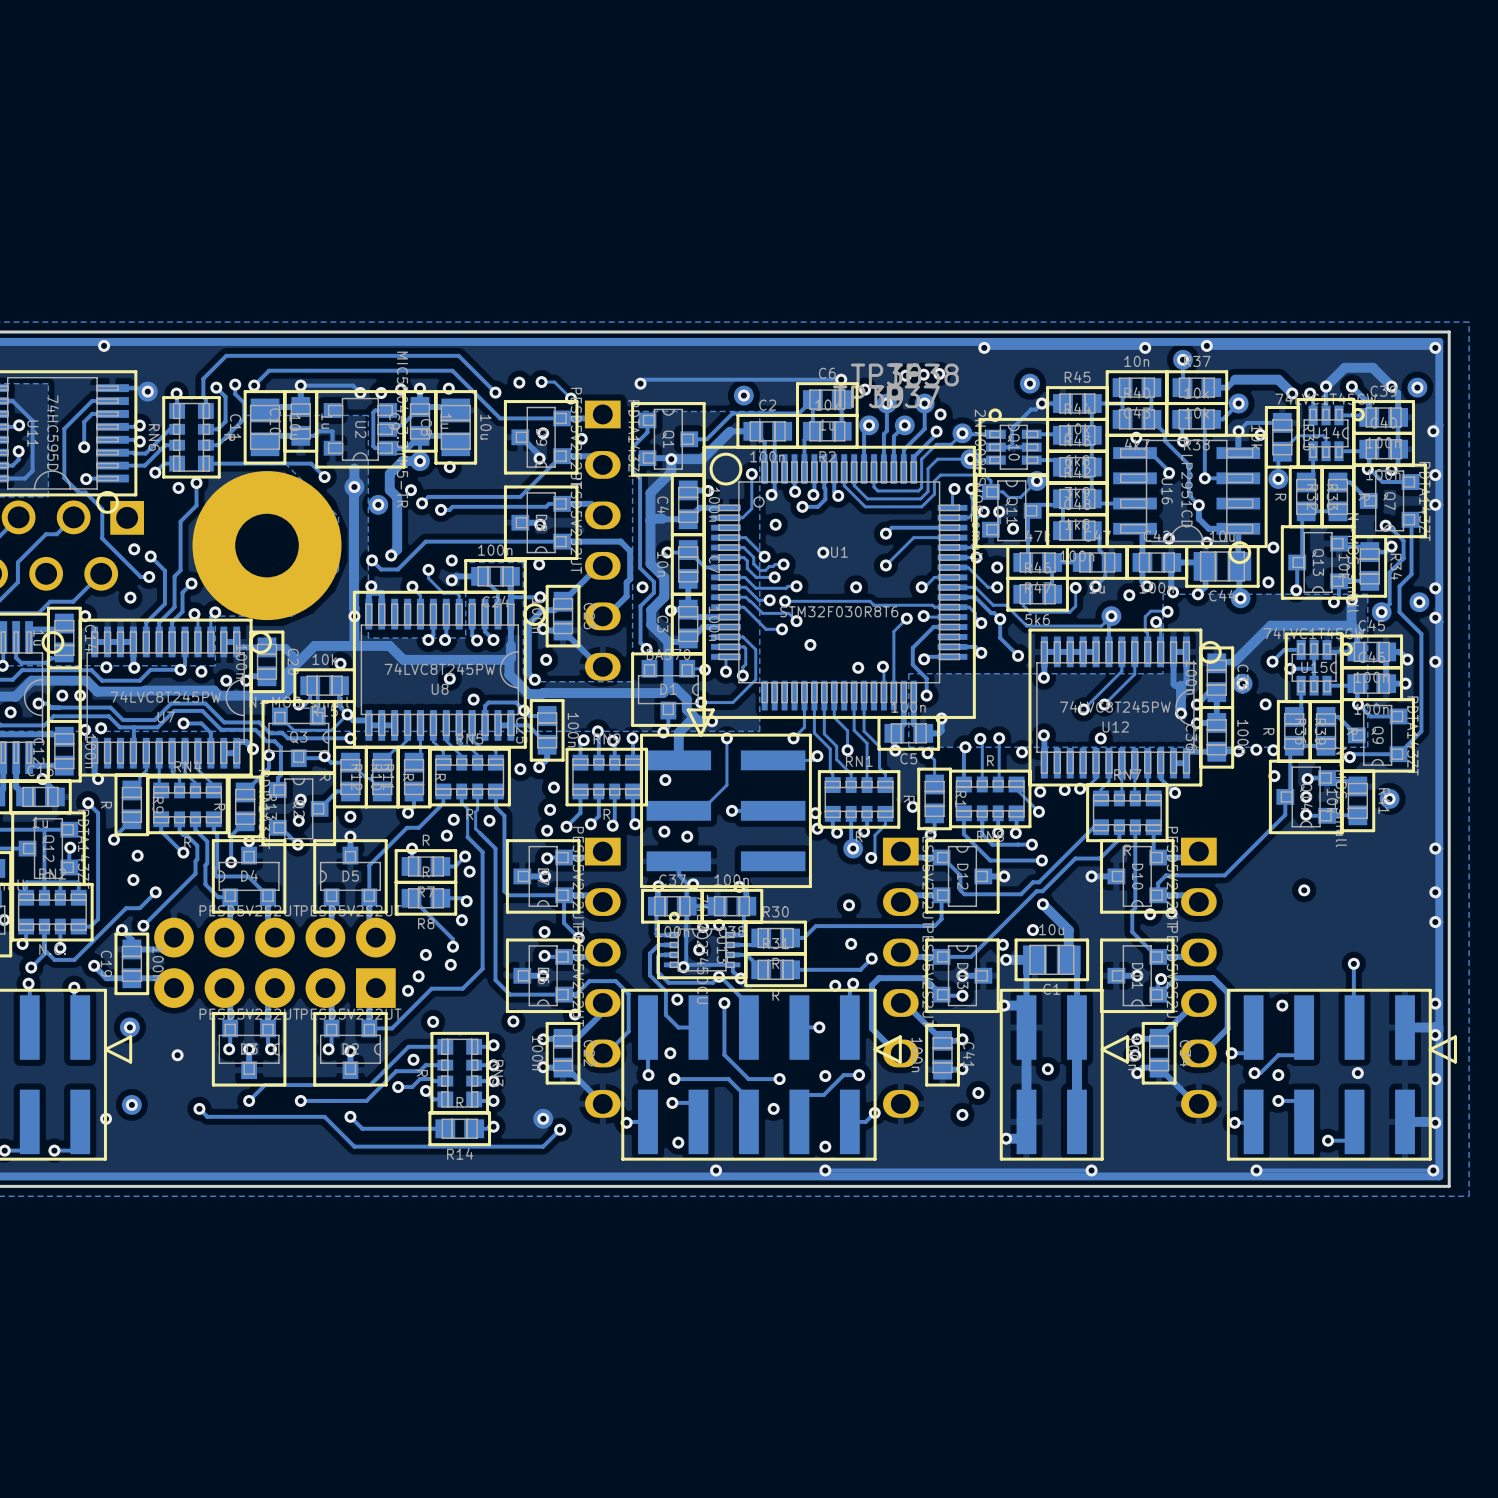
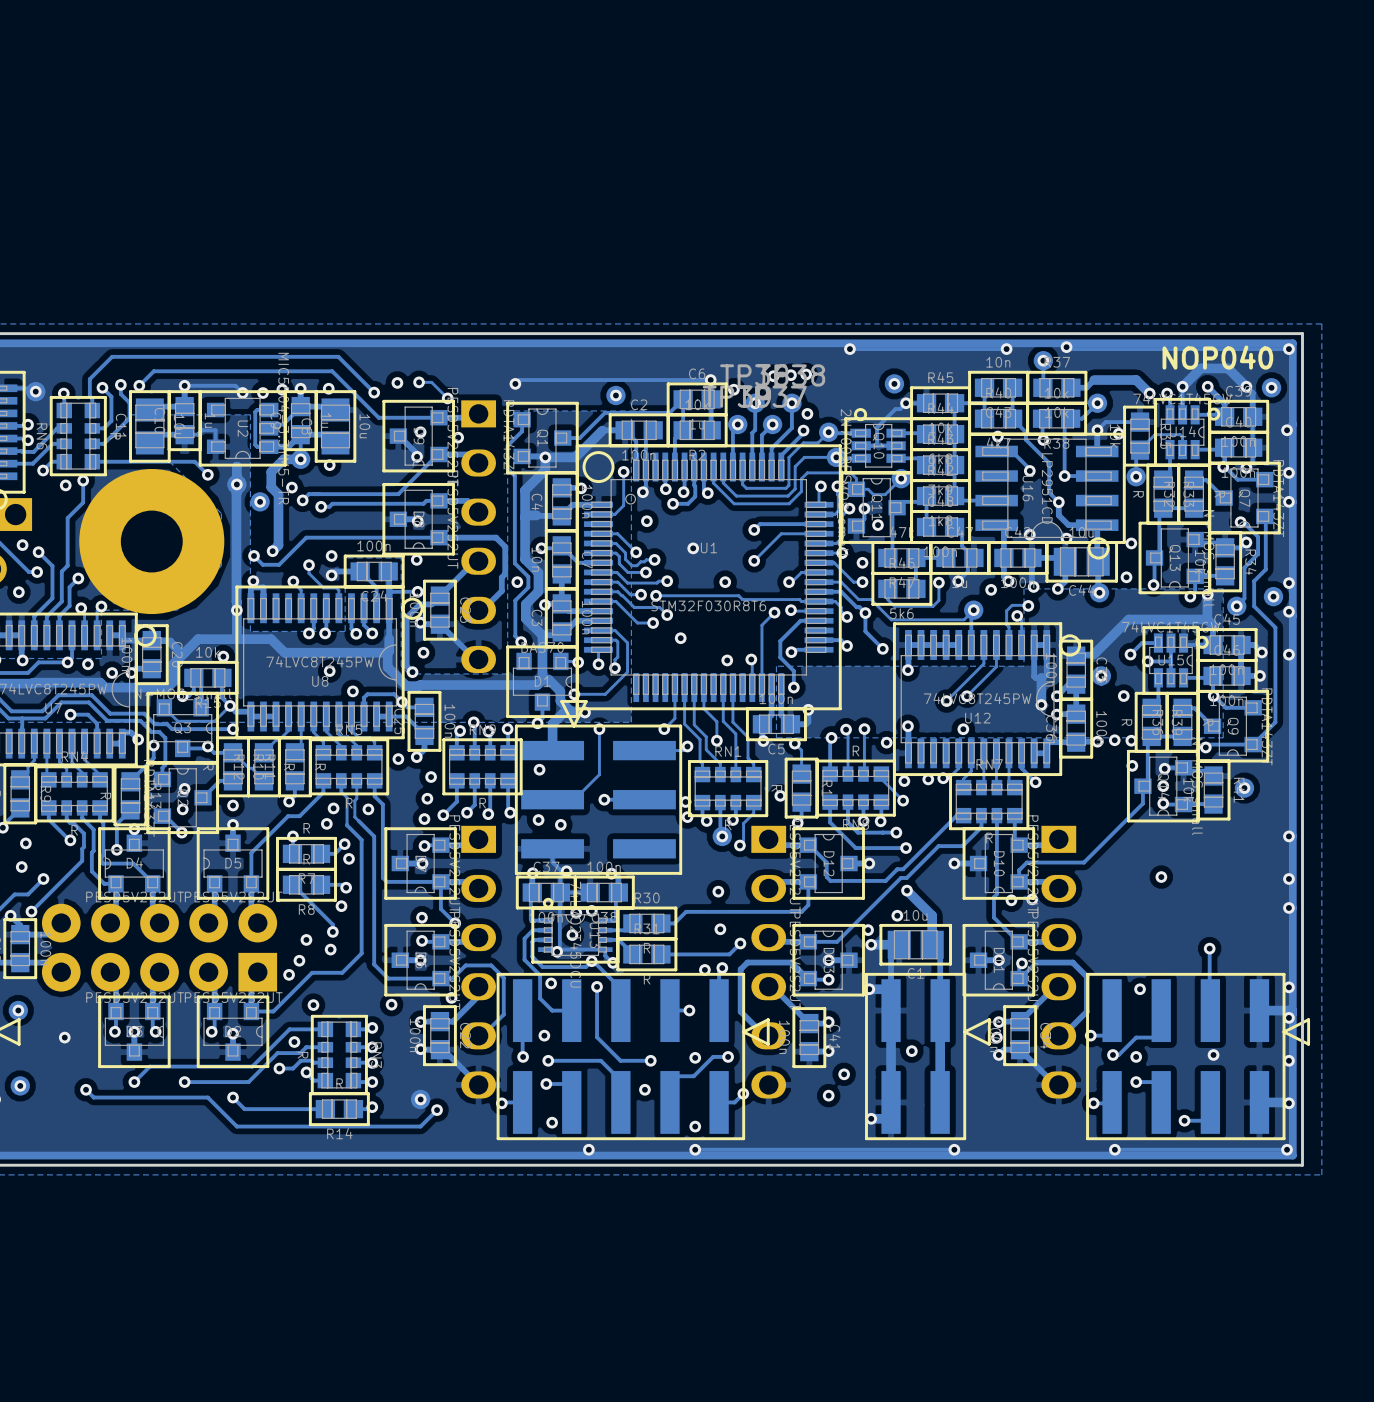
text: none -> NOP040 (1217, 357)

